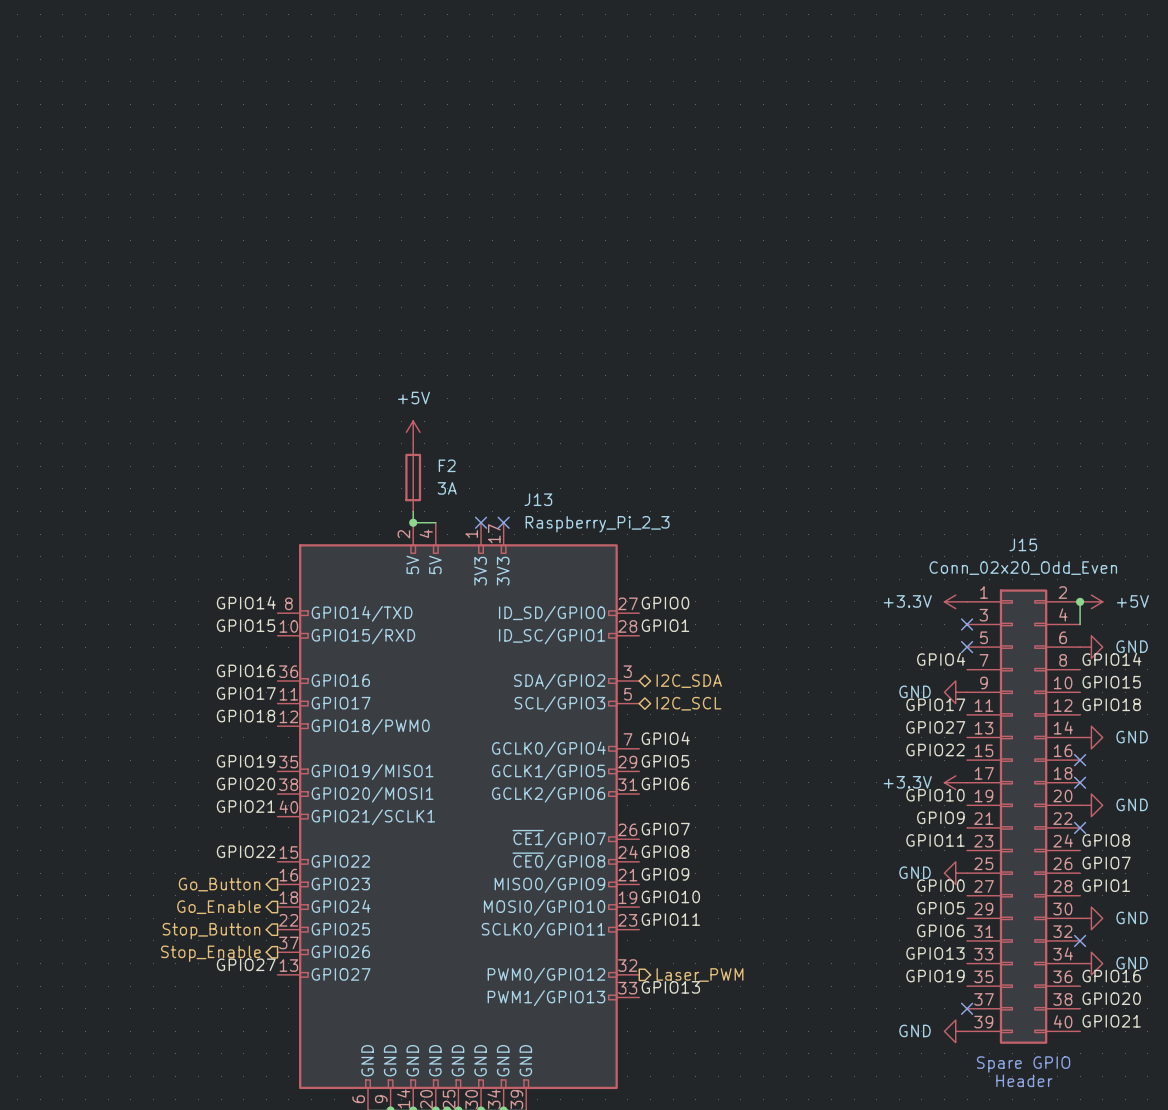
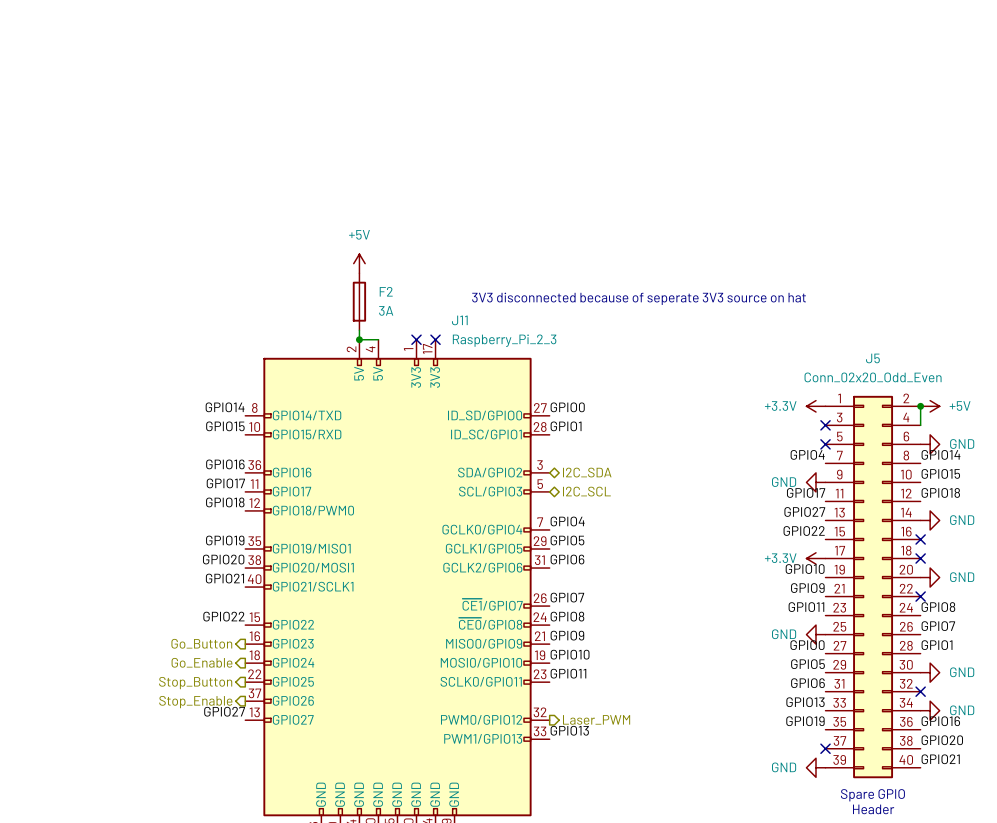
text: none -> 3V3 disconnected because of seperate 3V3 source on hat (639, 298)
J13 name: J13 (538, 499) -> J11 (459, 320)
J15 name: J15 (1023, 544) -> J5 (872, 358)

